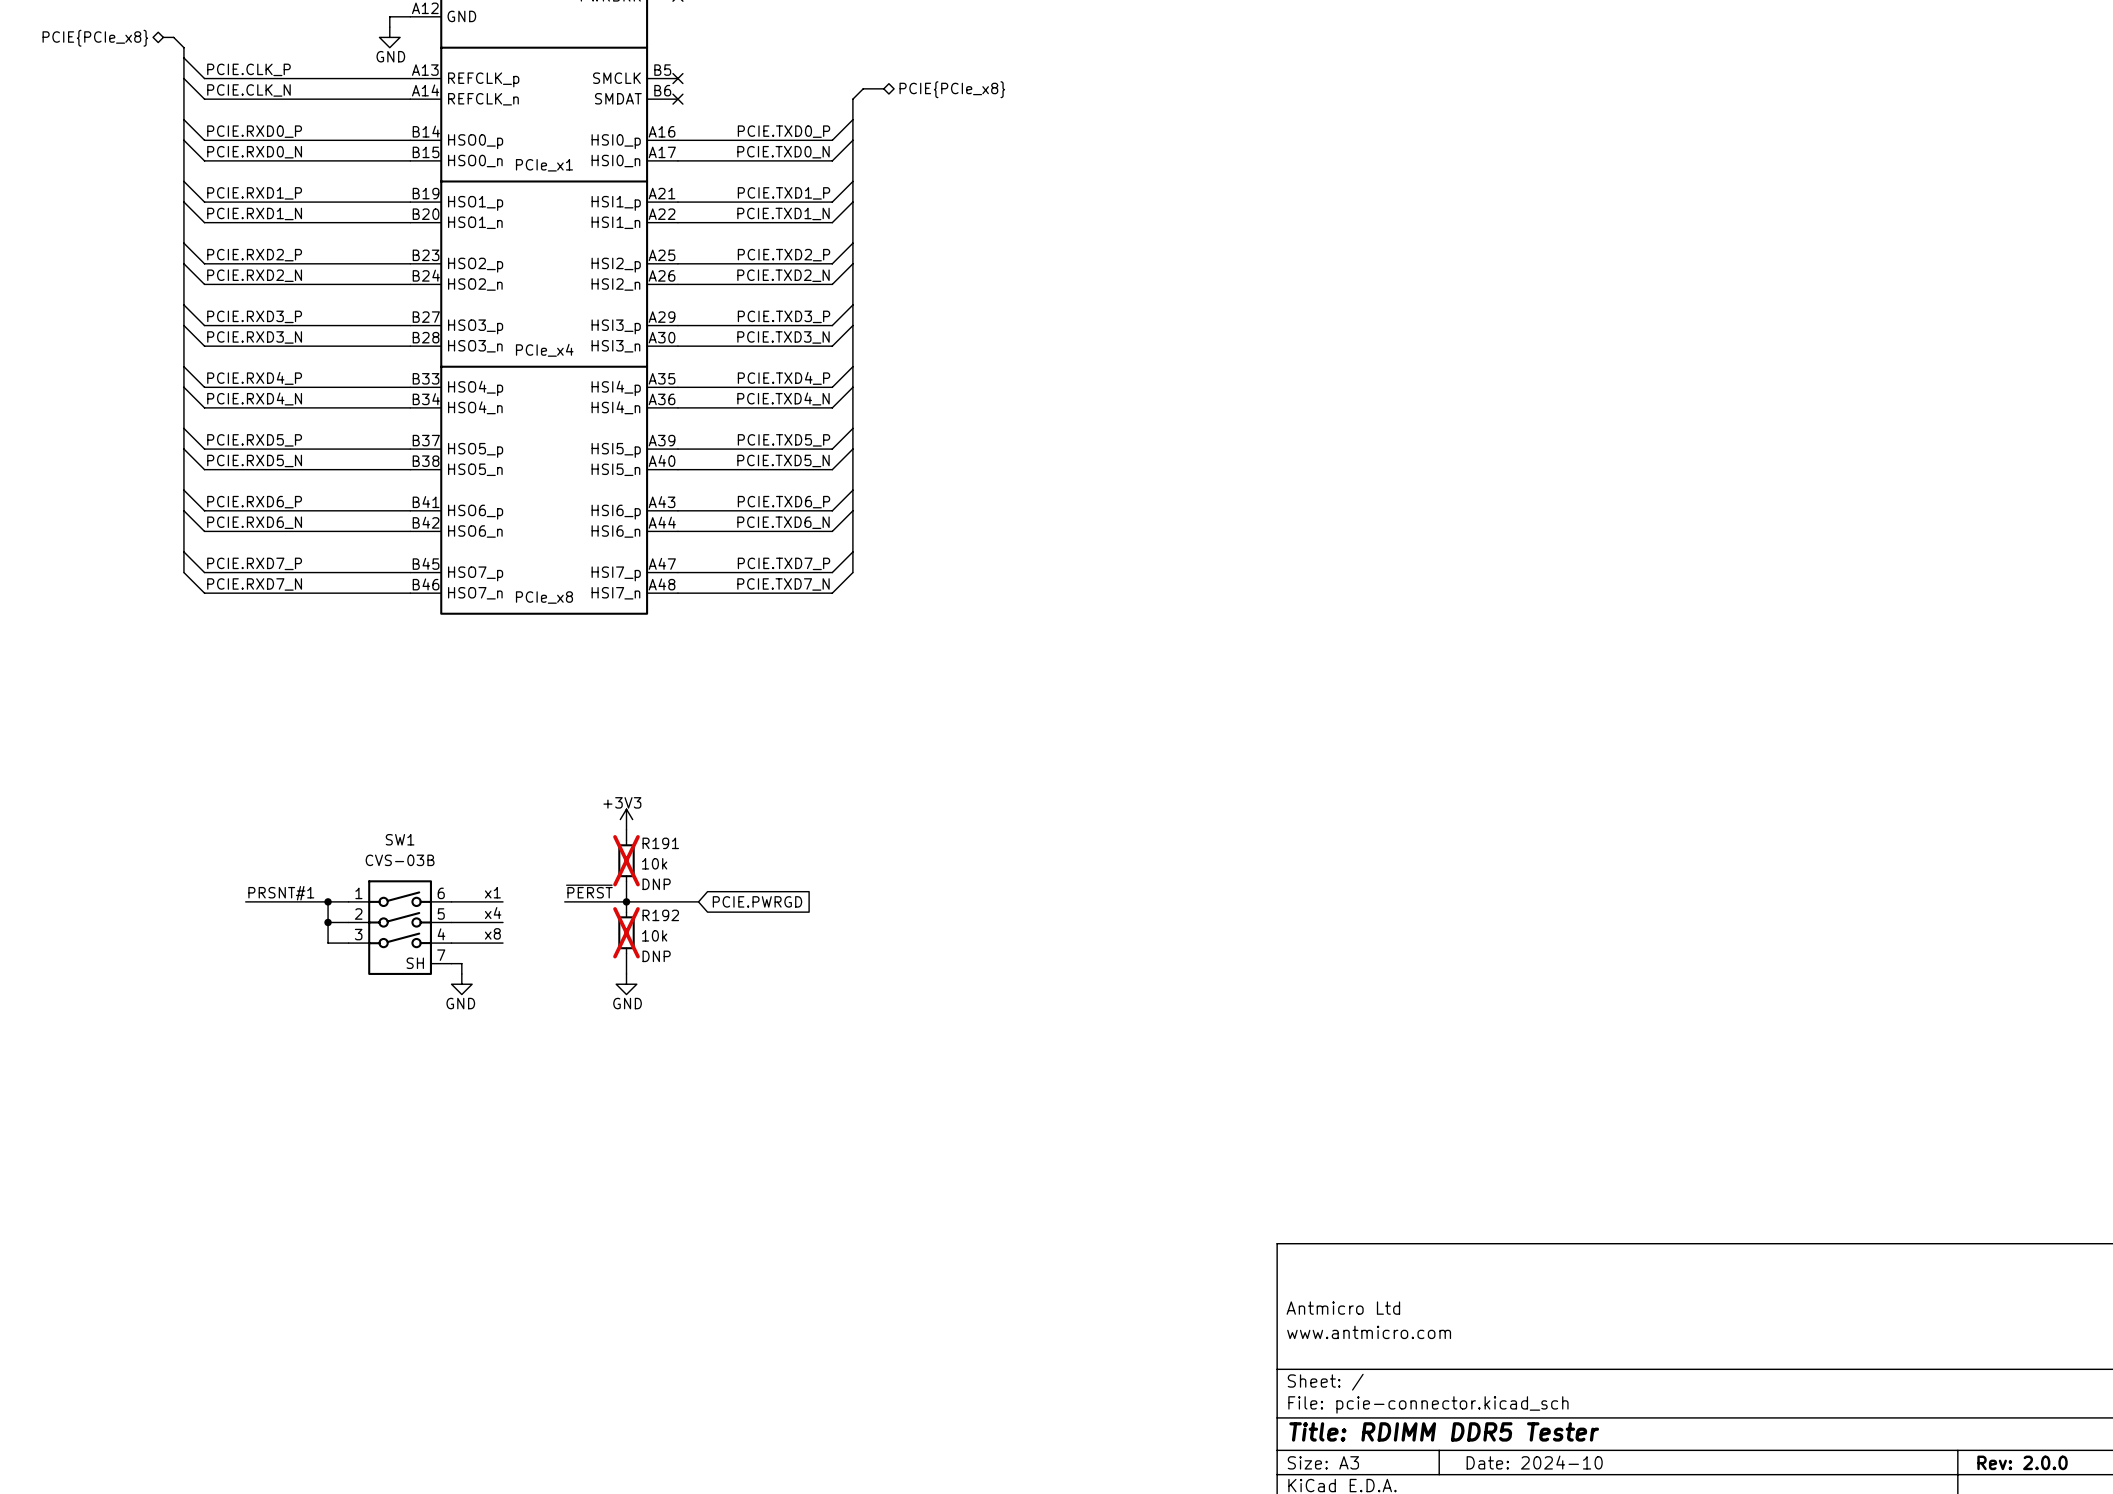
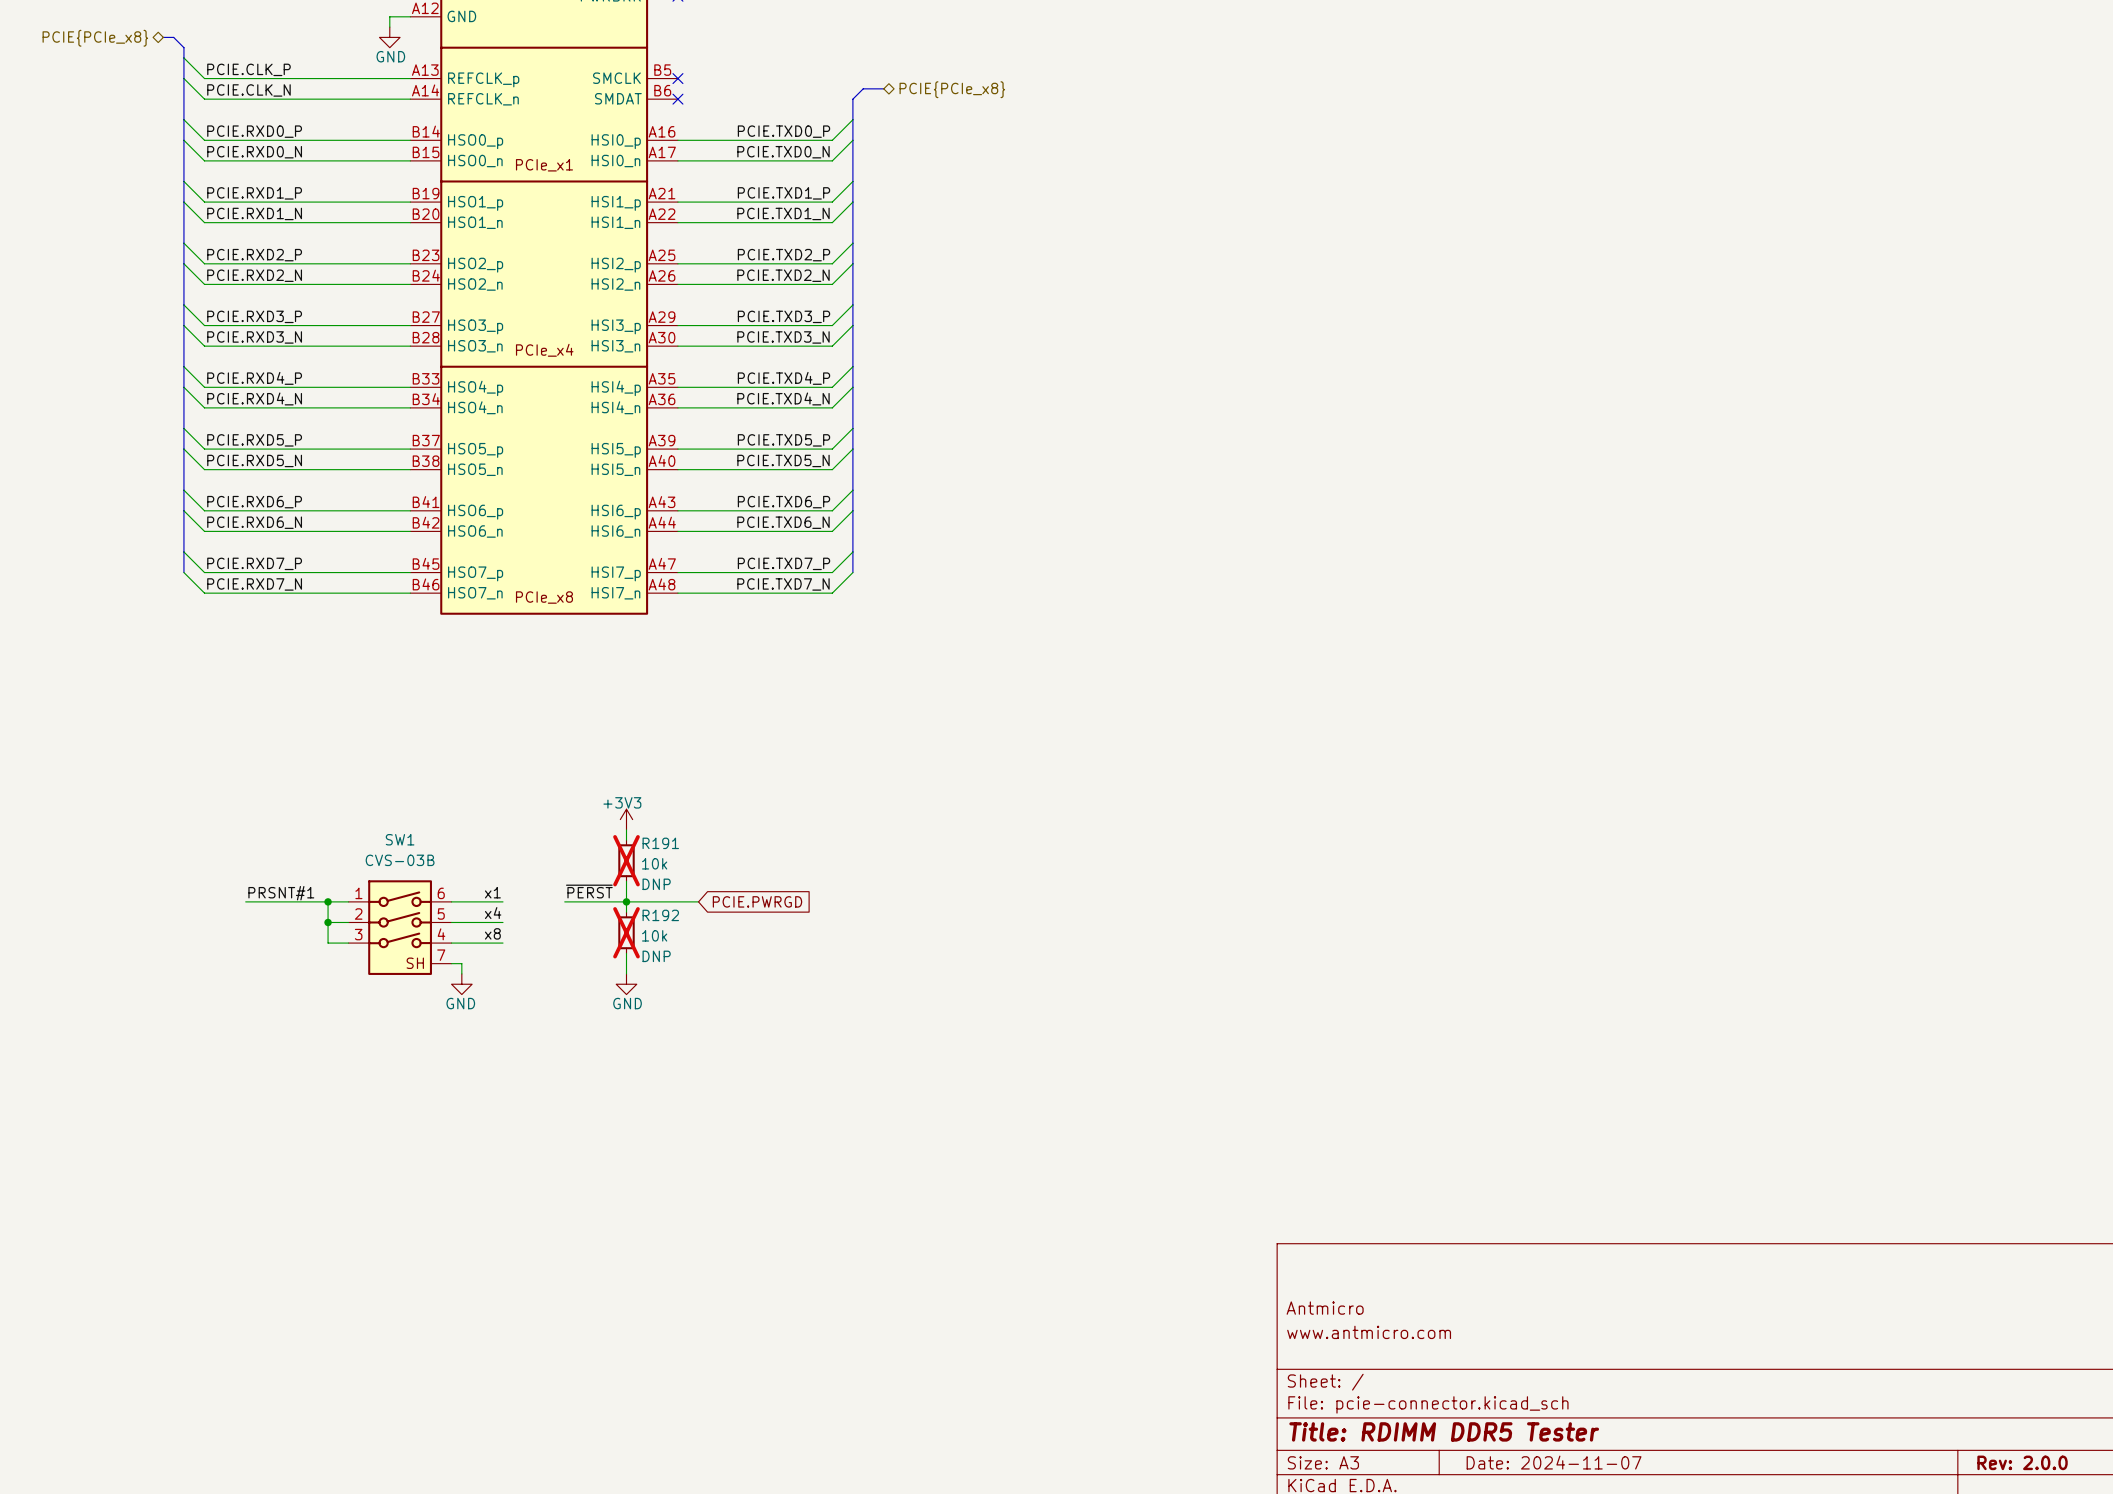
title block: Antmicro Ltd (1343, 1308) -> Antmicro (1325, 1308)
title block: Date: 2024-10 (1534, 1462) -> Date: 2024-11-07 (1554, 1462)

